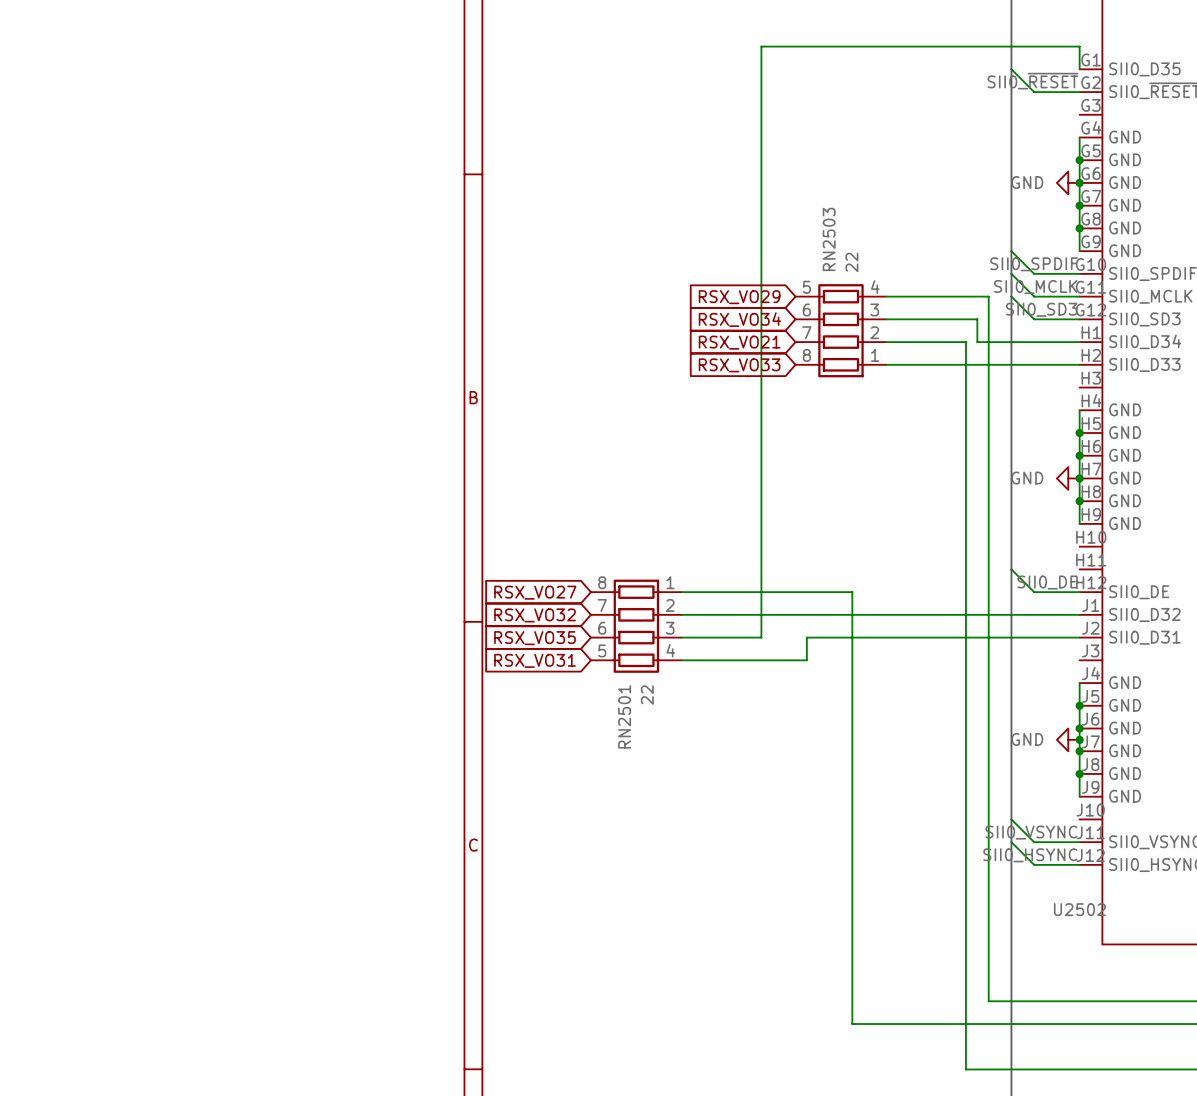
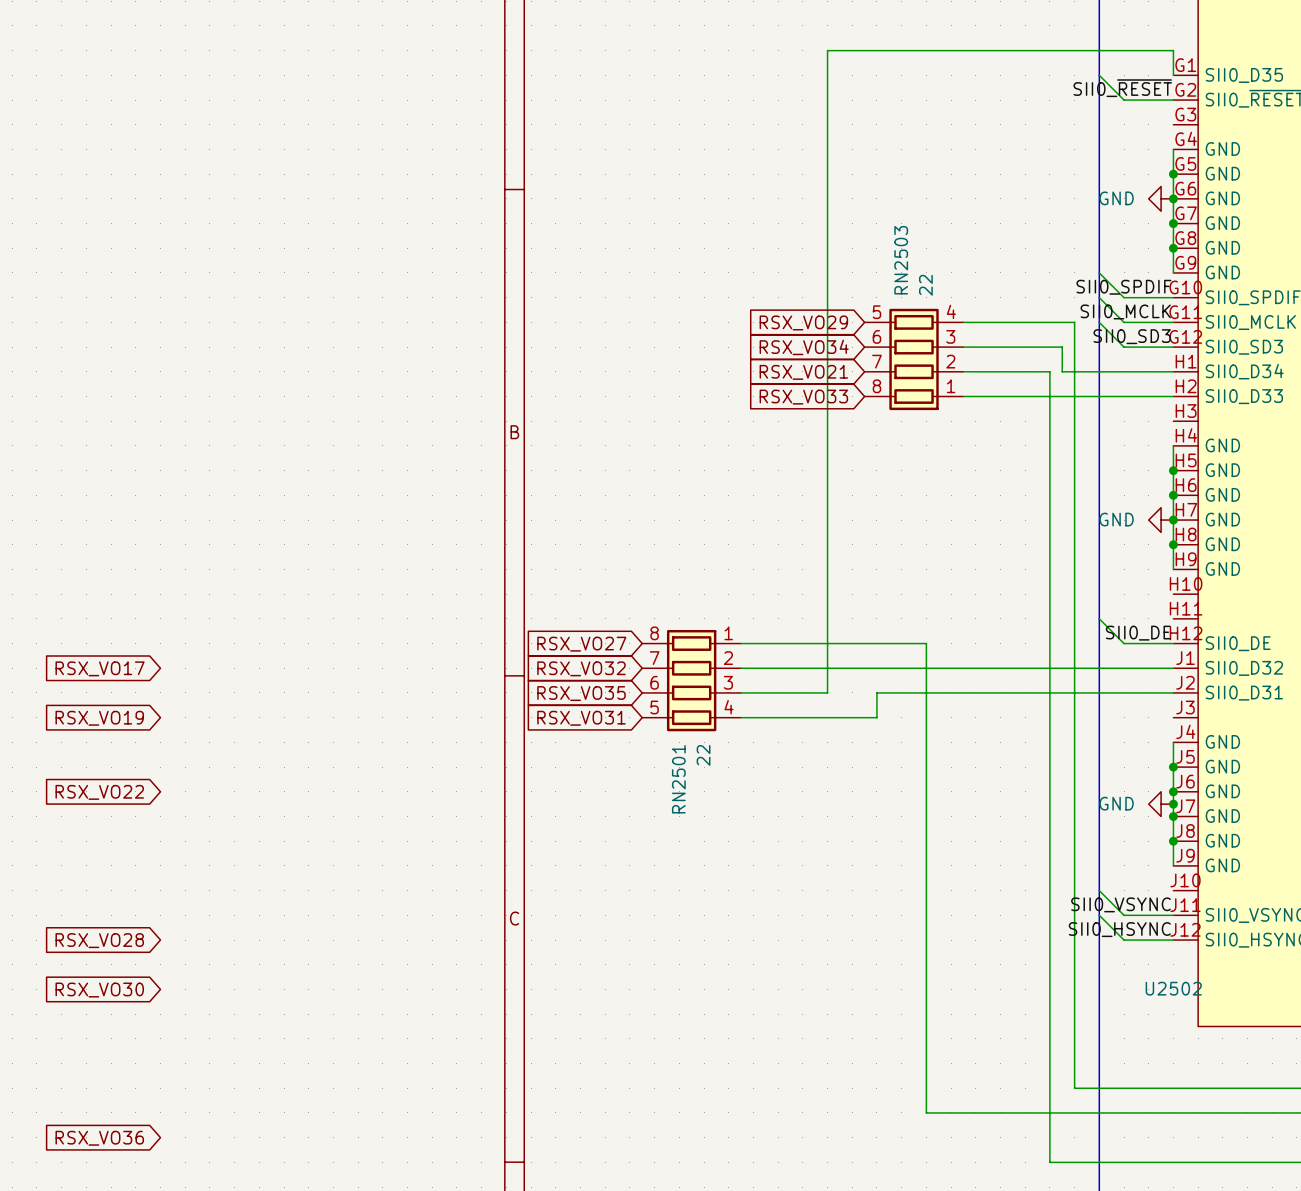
global label: none -> RSX_VO17 (100, 668)
global label: none -> RSX_VO19 (99, 718)
global label: none -> RSX_VO22 (99, 792)
global label: none -> RSX_VO28 (99, 940)
global label: none -> RSX_VO30 (99, 990)
global label: none -> RSX_VO36 (99, 1138)

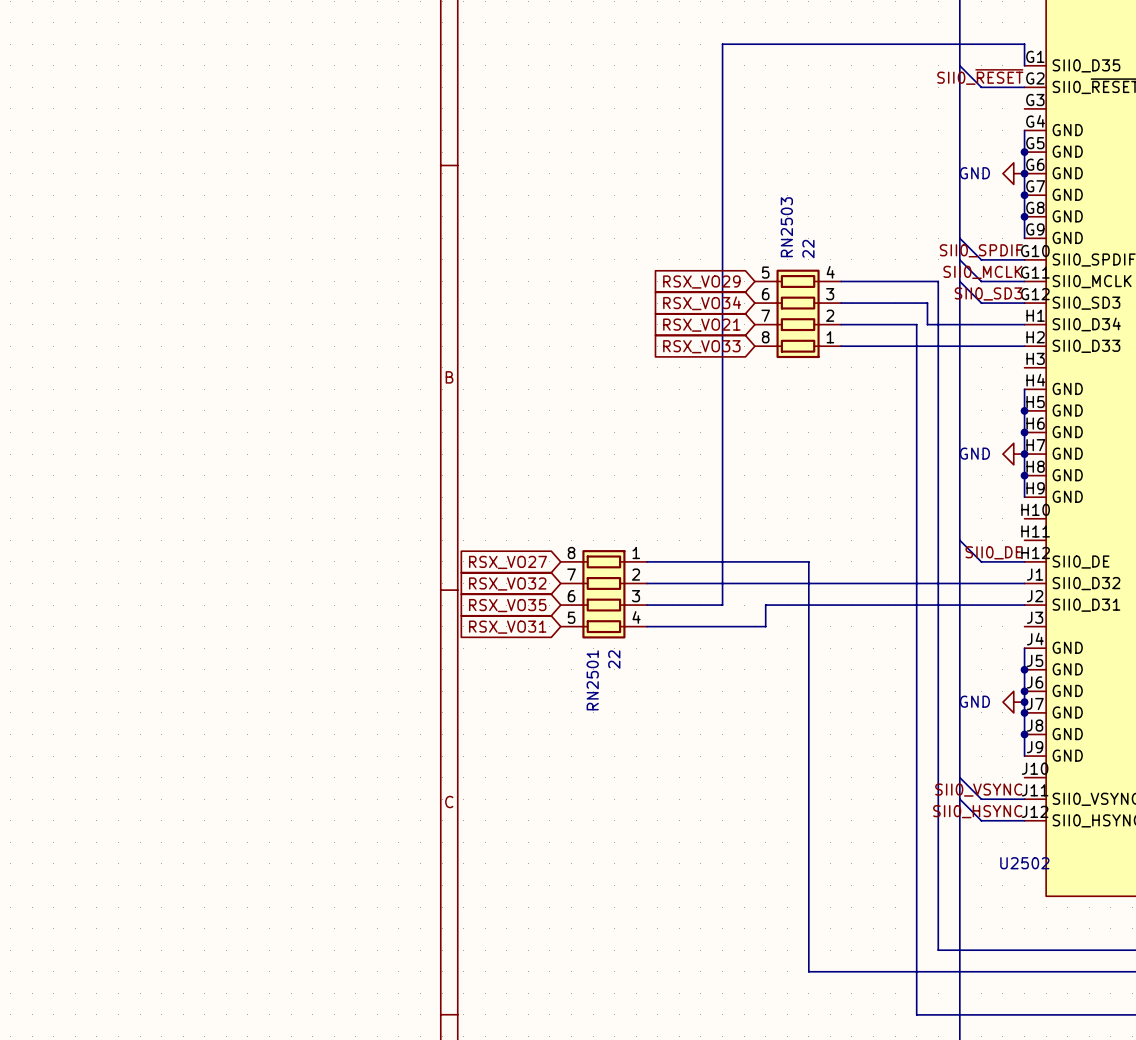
global label: RSX_VO17 (100, 668) -> none
global label: RSX_VO19 (99, 718) -> none
global label: RSX_VO22 (99, 792) -> none
global label: RSX_VO28 (99, 940) -> none
global label: RSX_VO30 (99, 990) -> none
global label: RSX_VO36 (99, 1138) -> none

